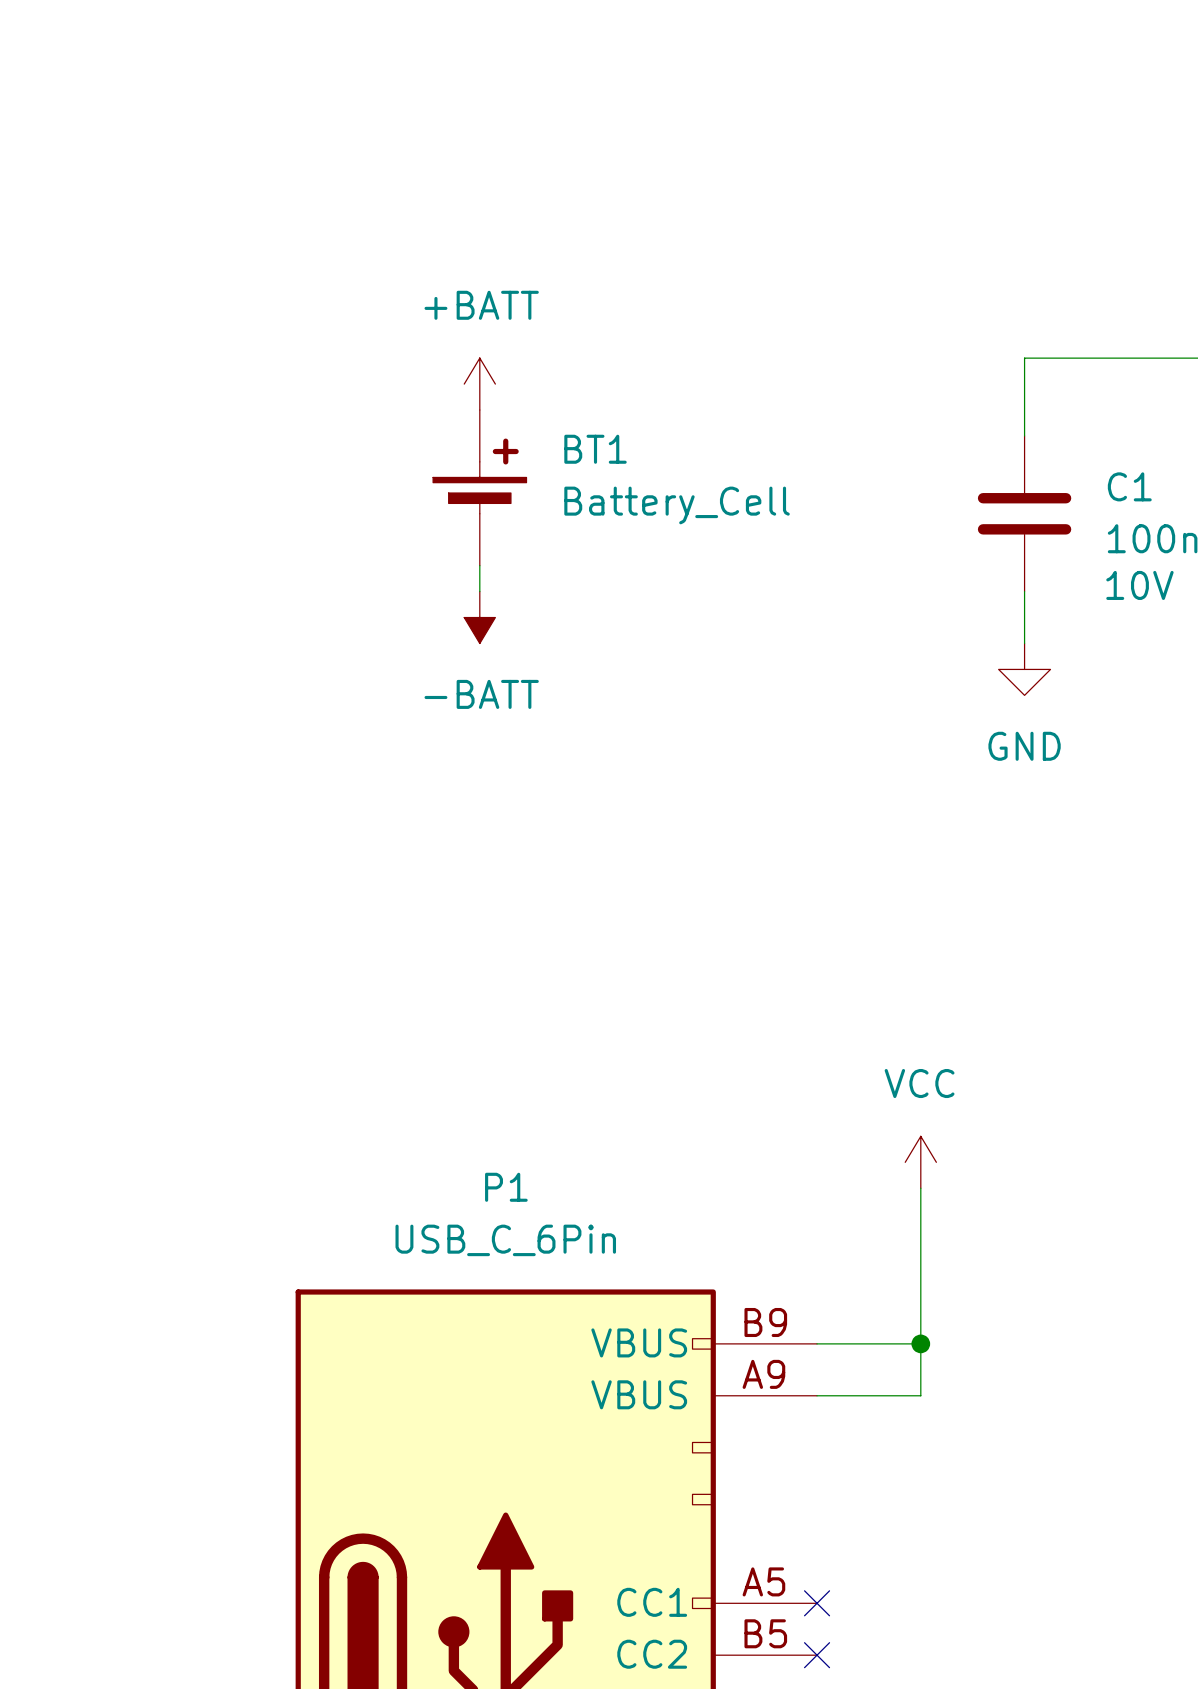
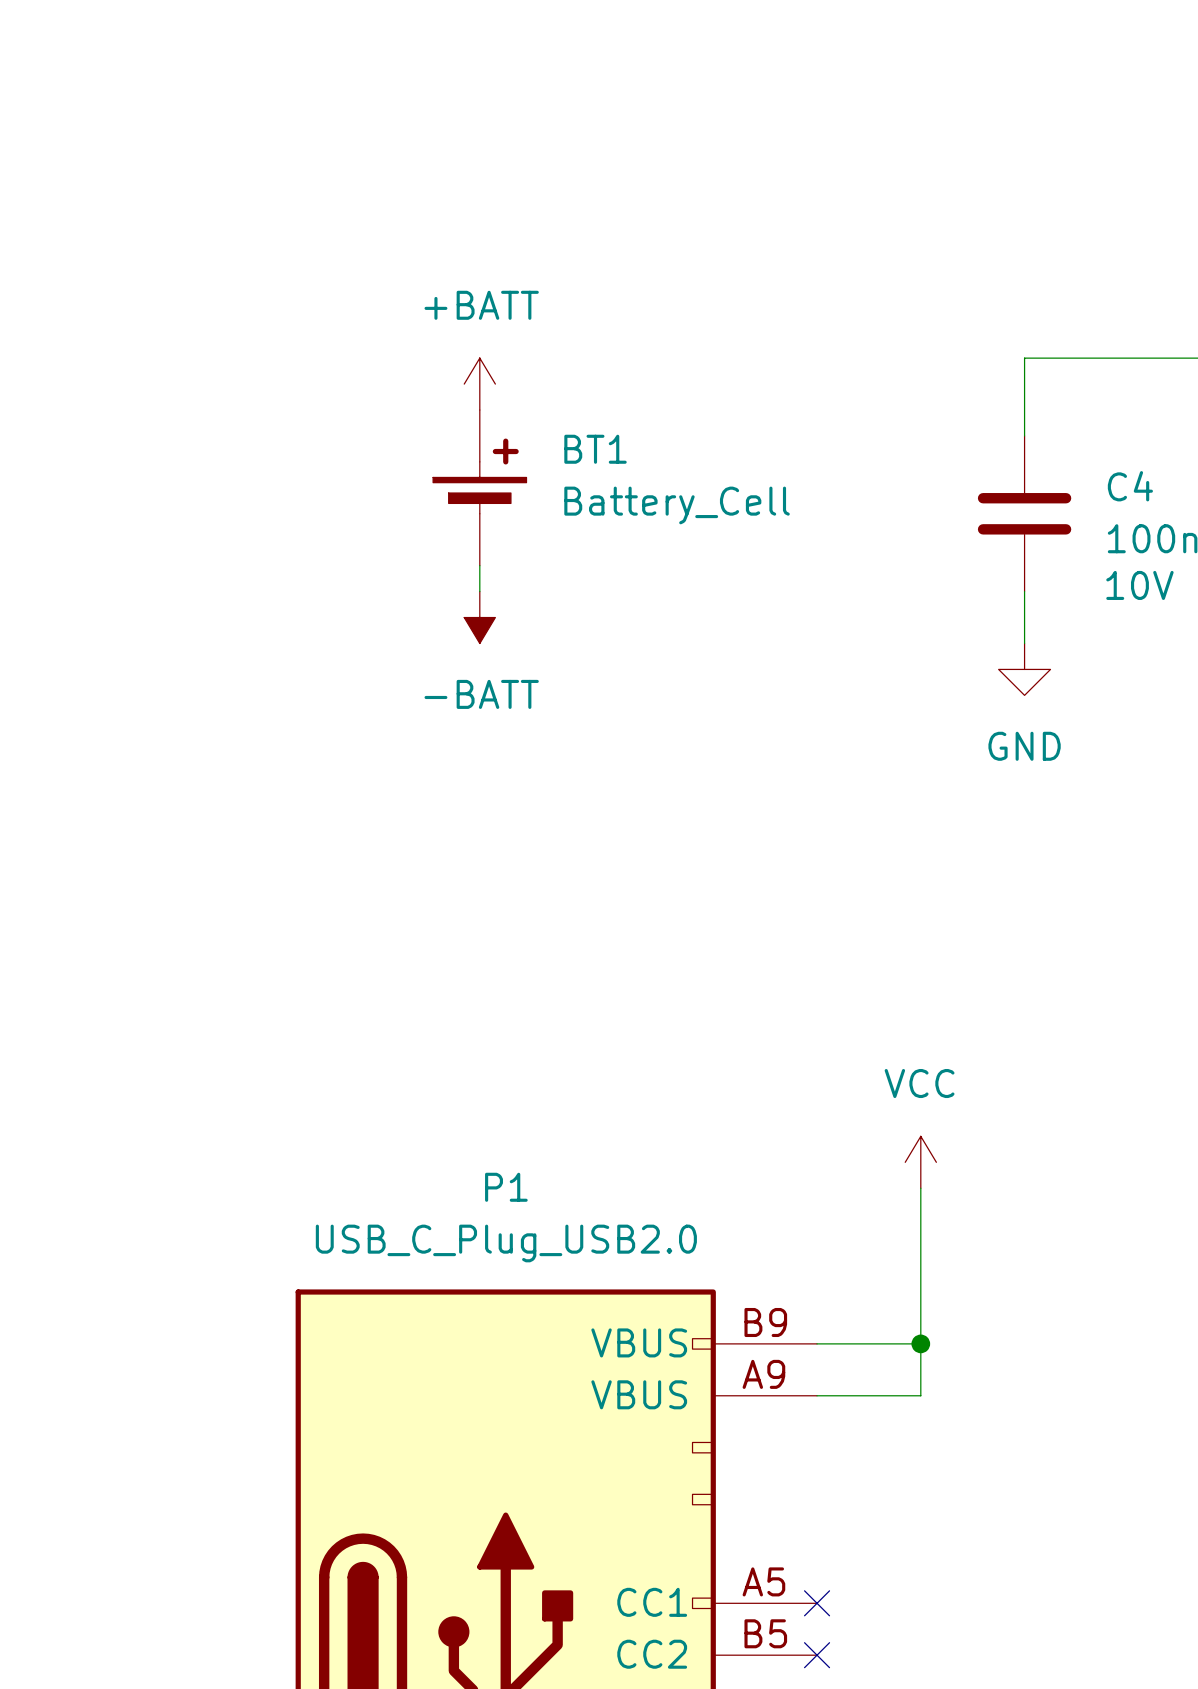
C1 name: C1 (1129, 486) -> C4 (1130, 486)
P1 value: USB_C_6Pin (505, 1240) -> USB_C_Plug_USB2.0 (506, 1243)

